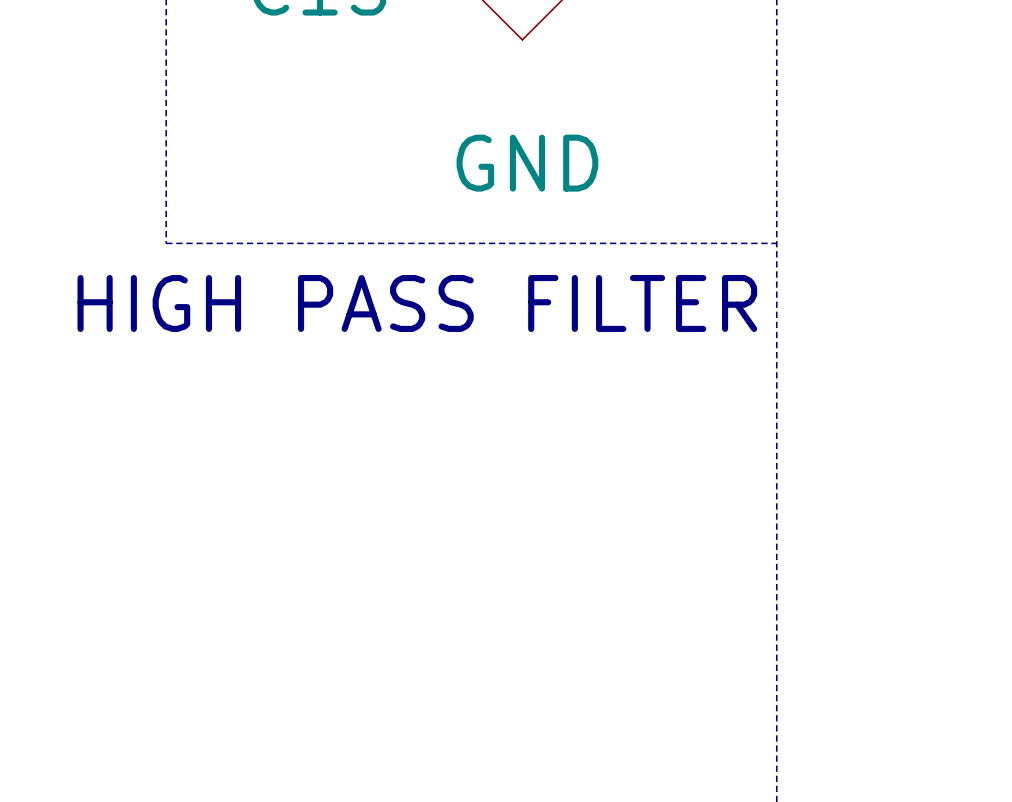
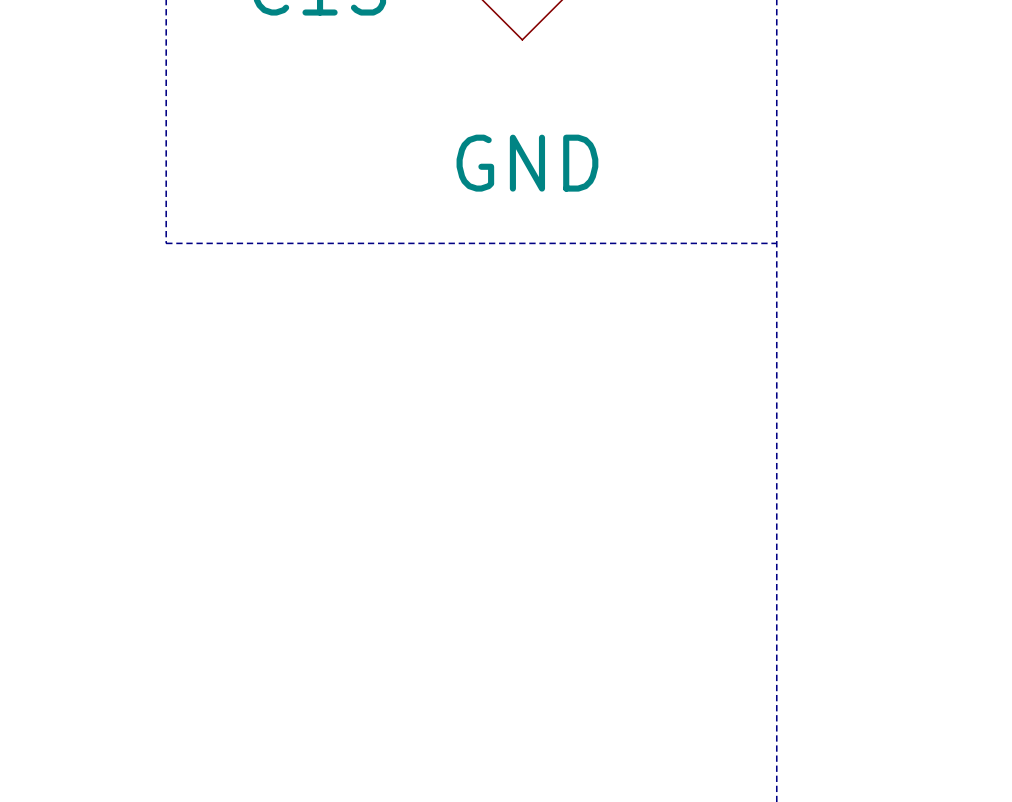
text: HIGH PASS FILTER (417, 303) -> none

